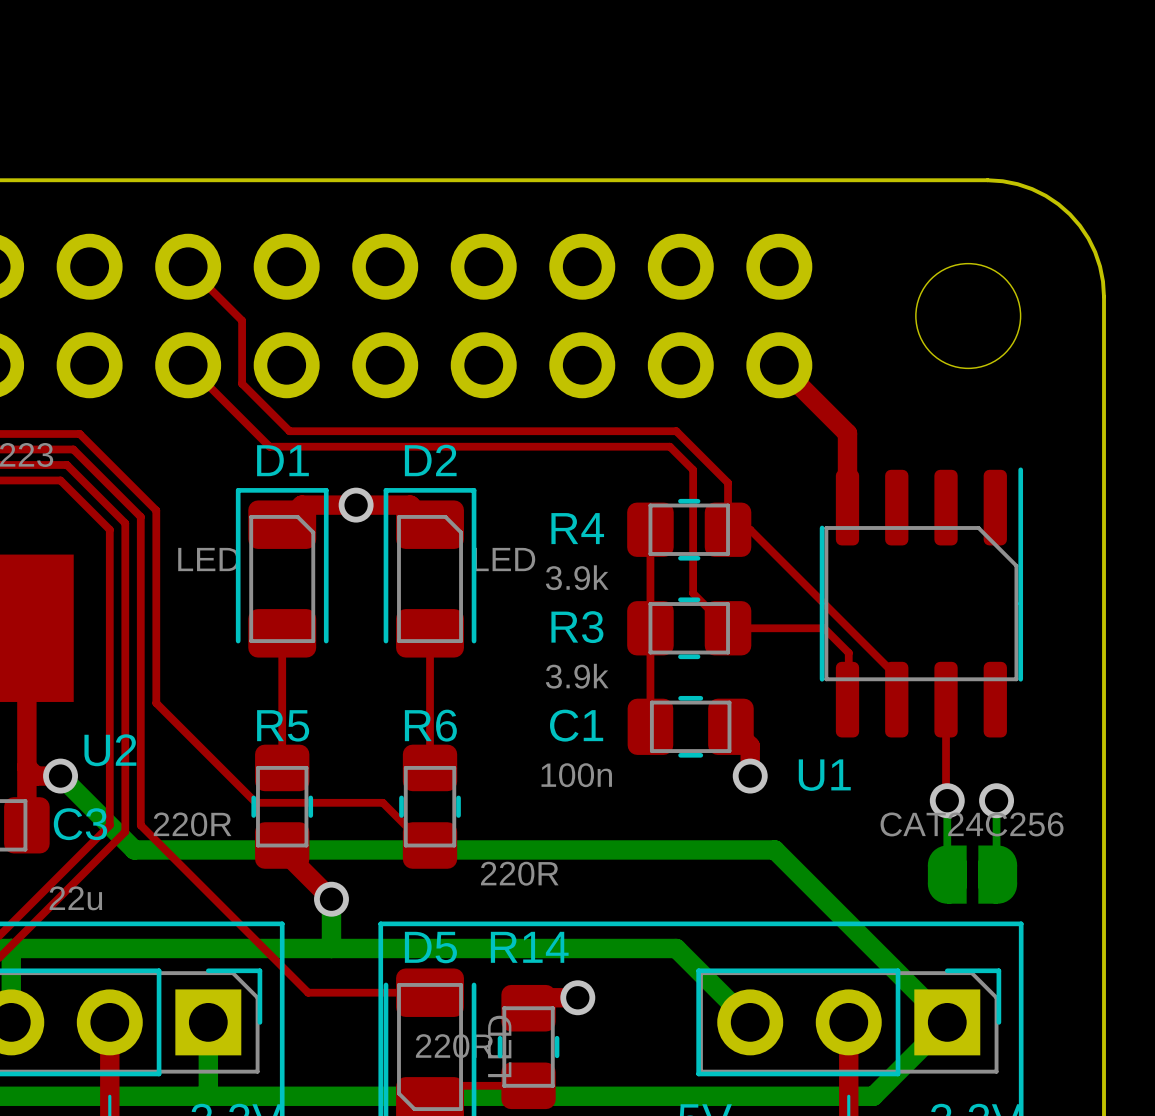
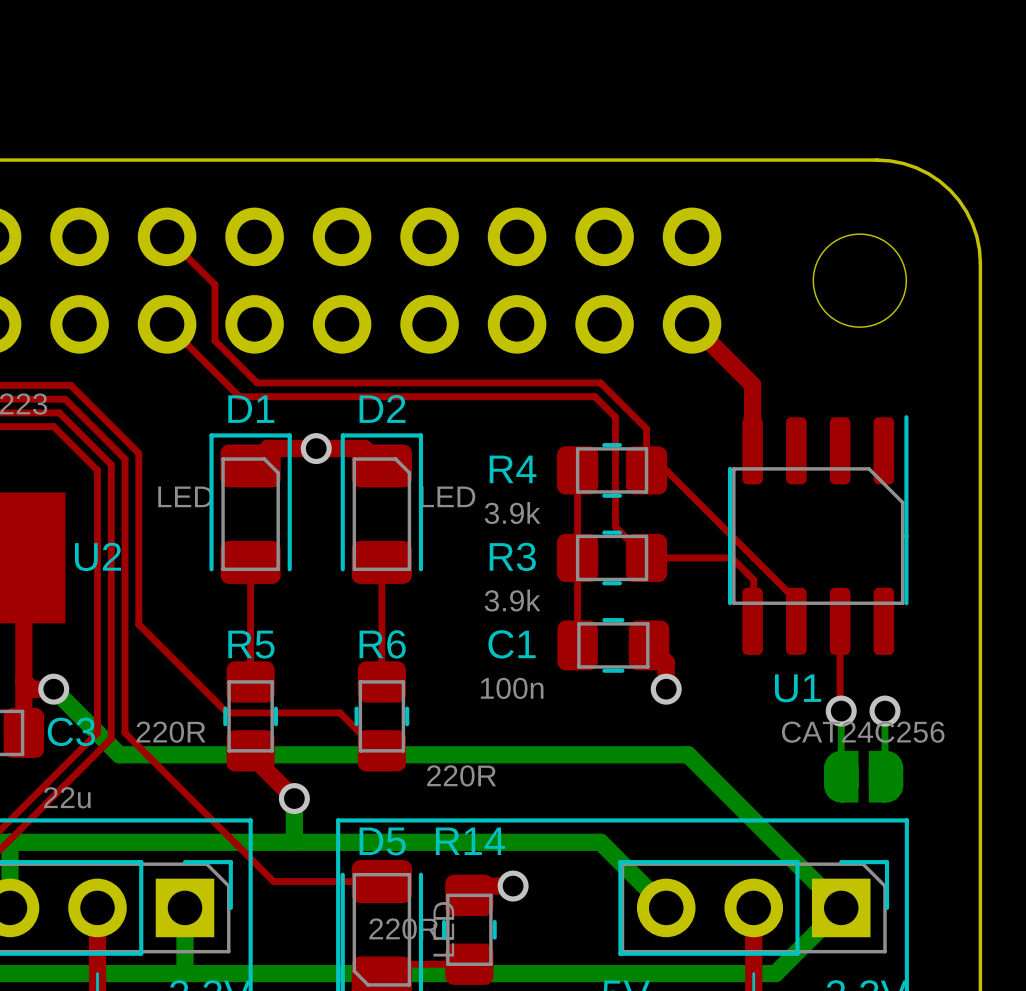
U2 name position: U2 (110, 750) -> U2 (98, 556)
U1 name position: U1 (824, 775) -> U1 (798, 688)

